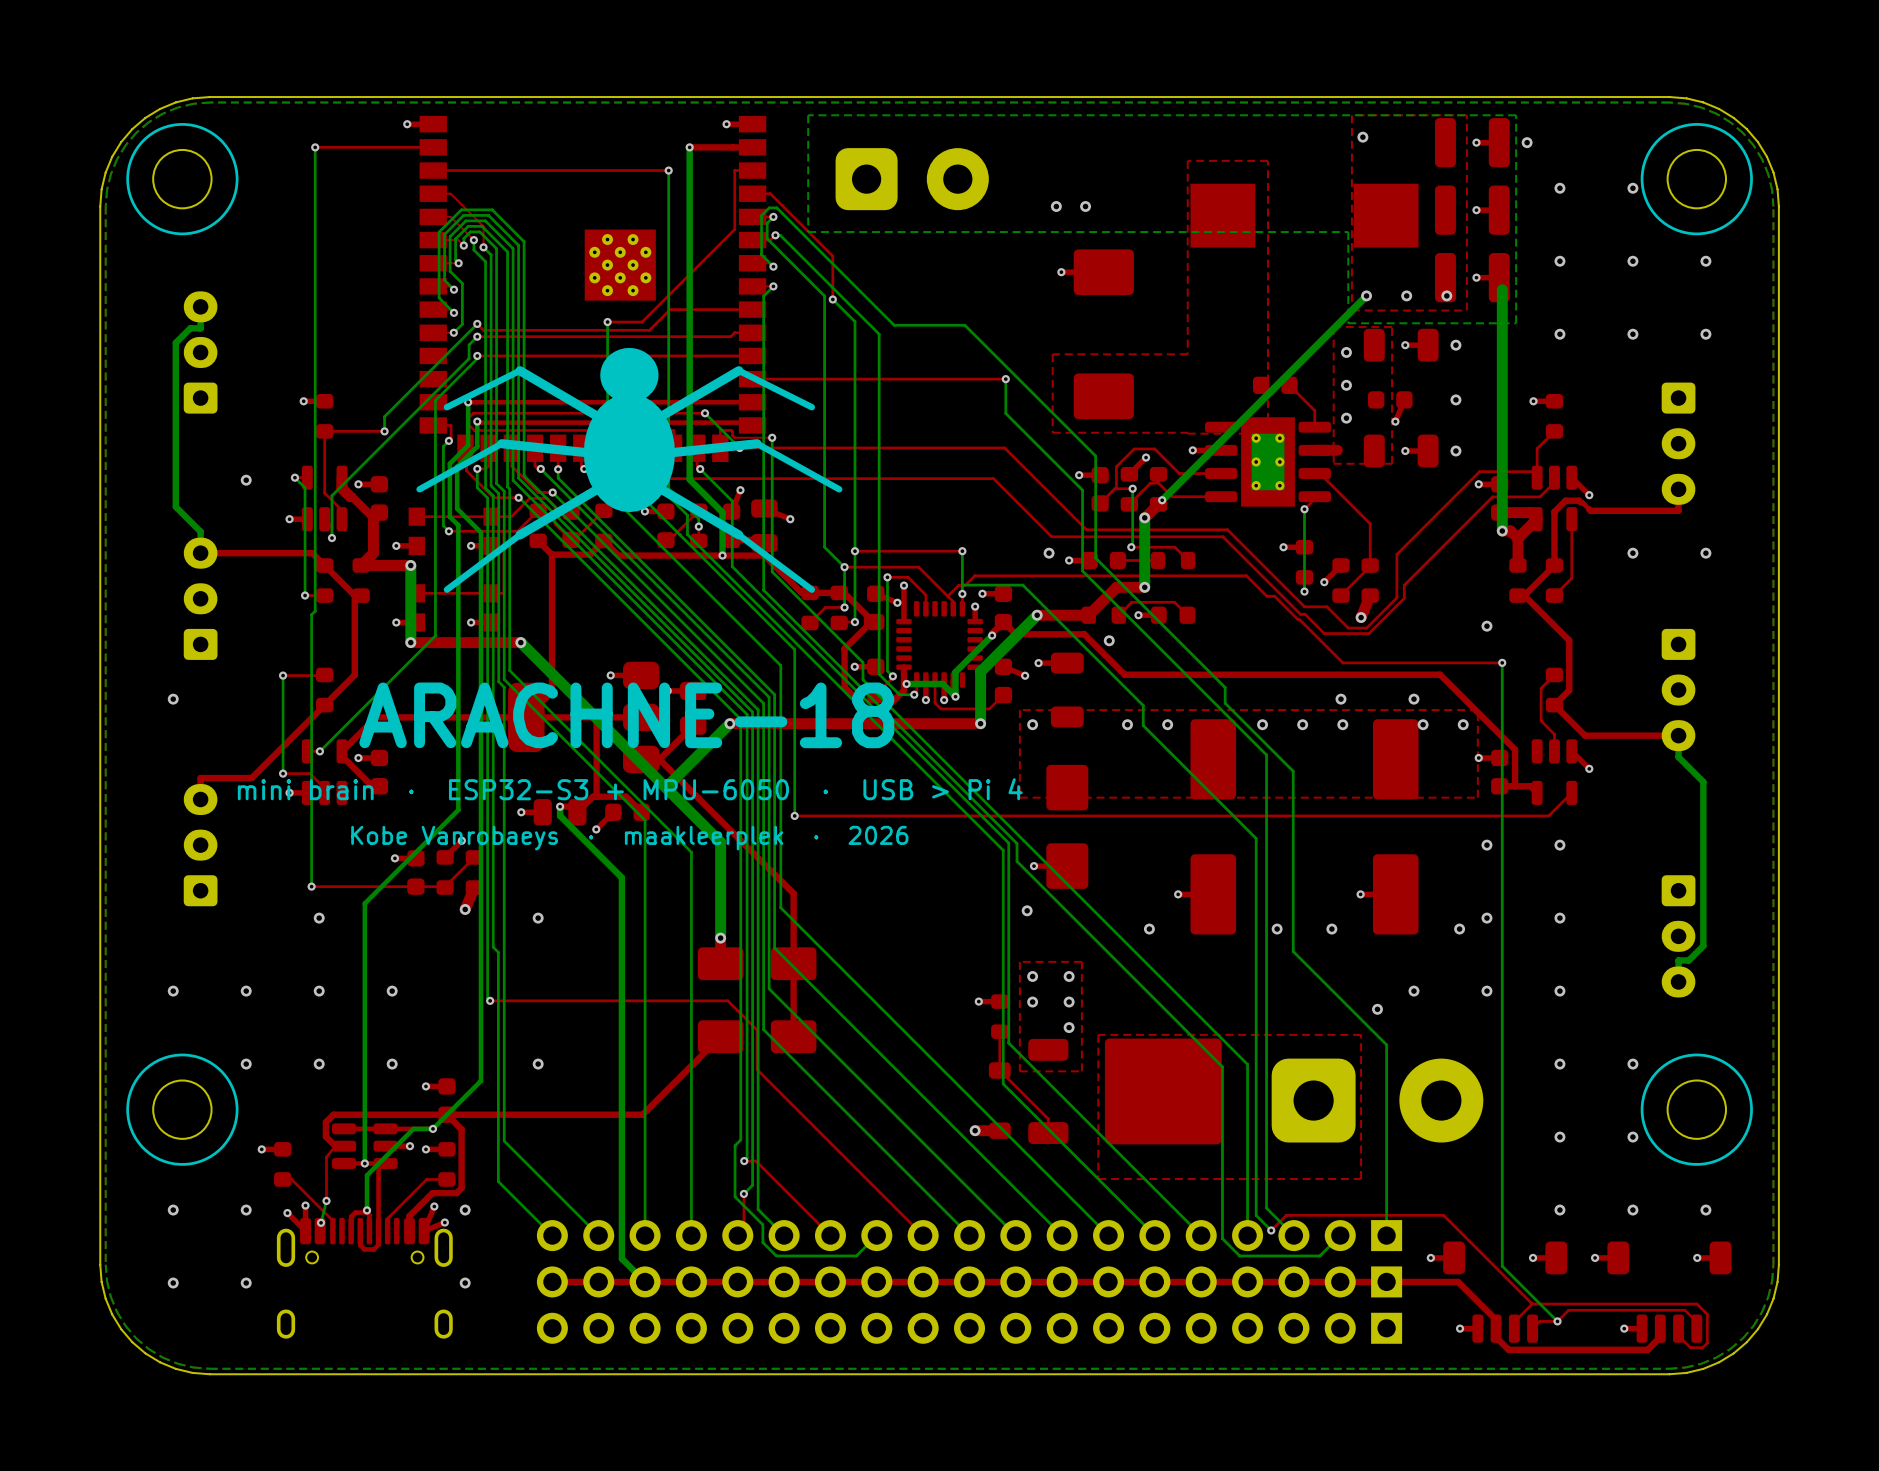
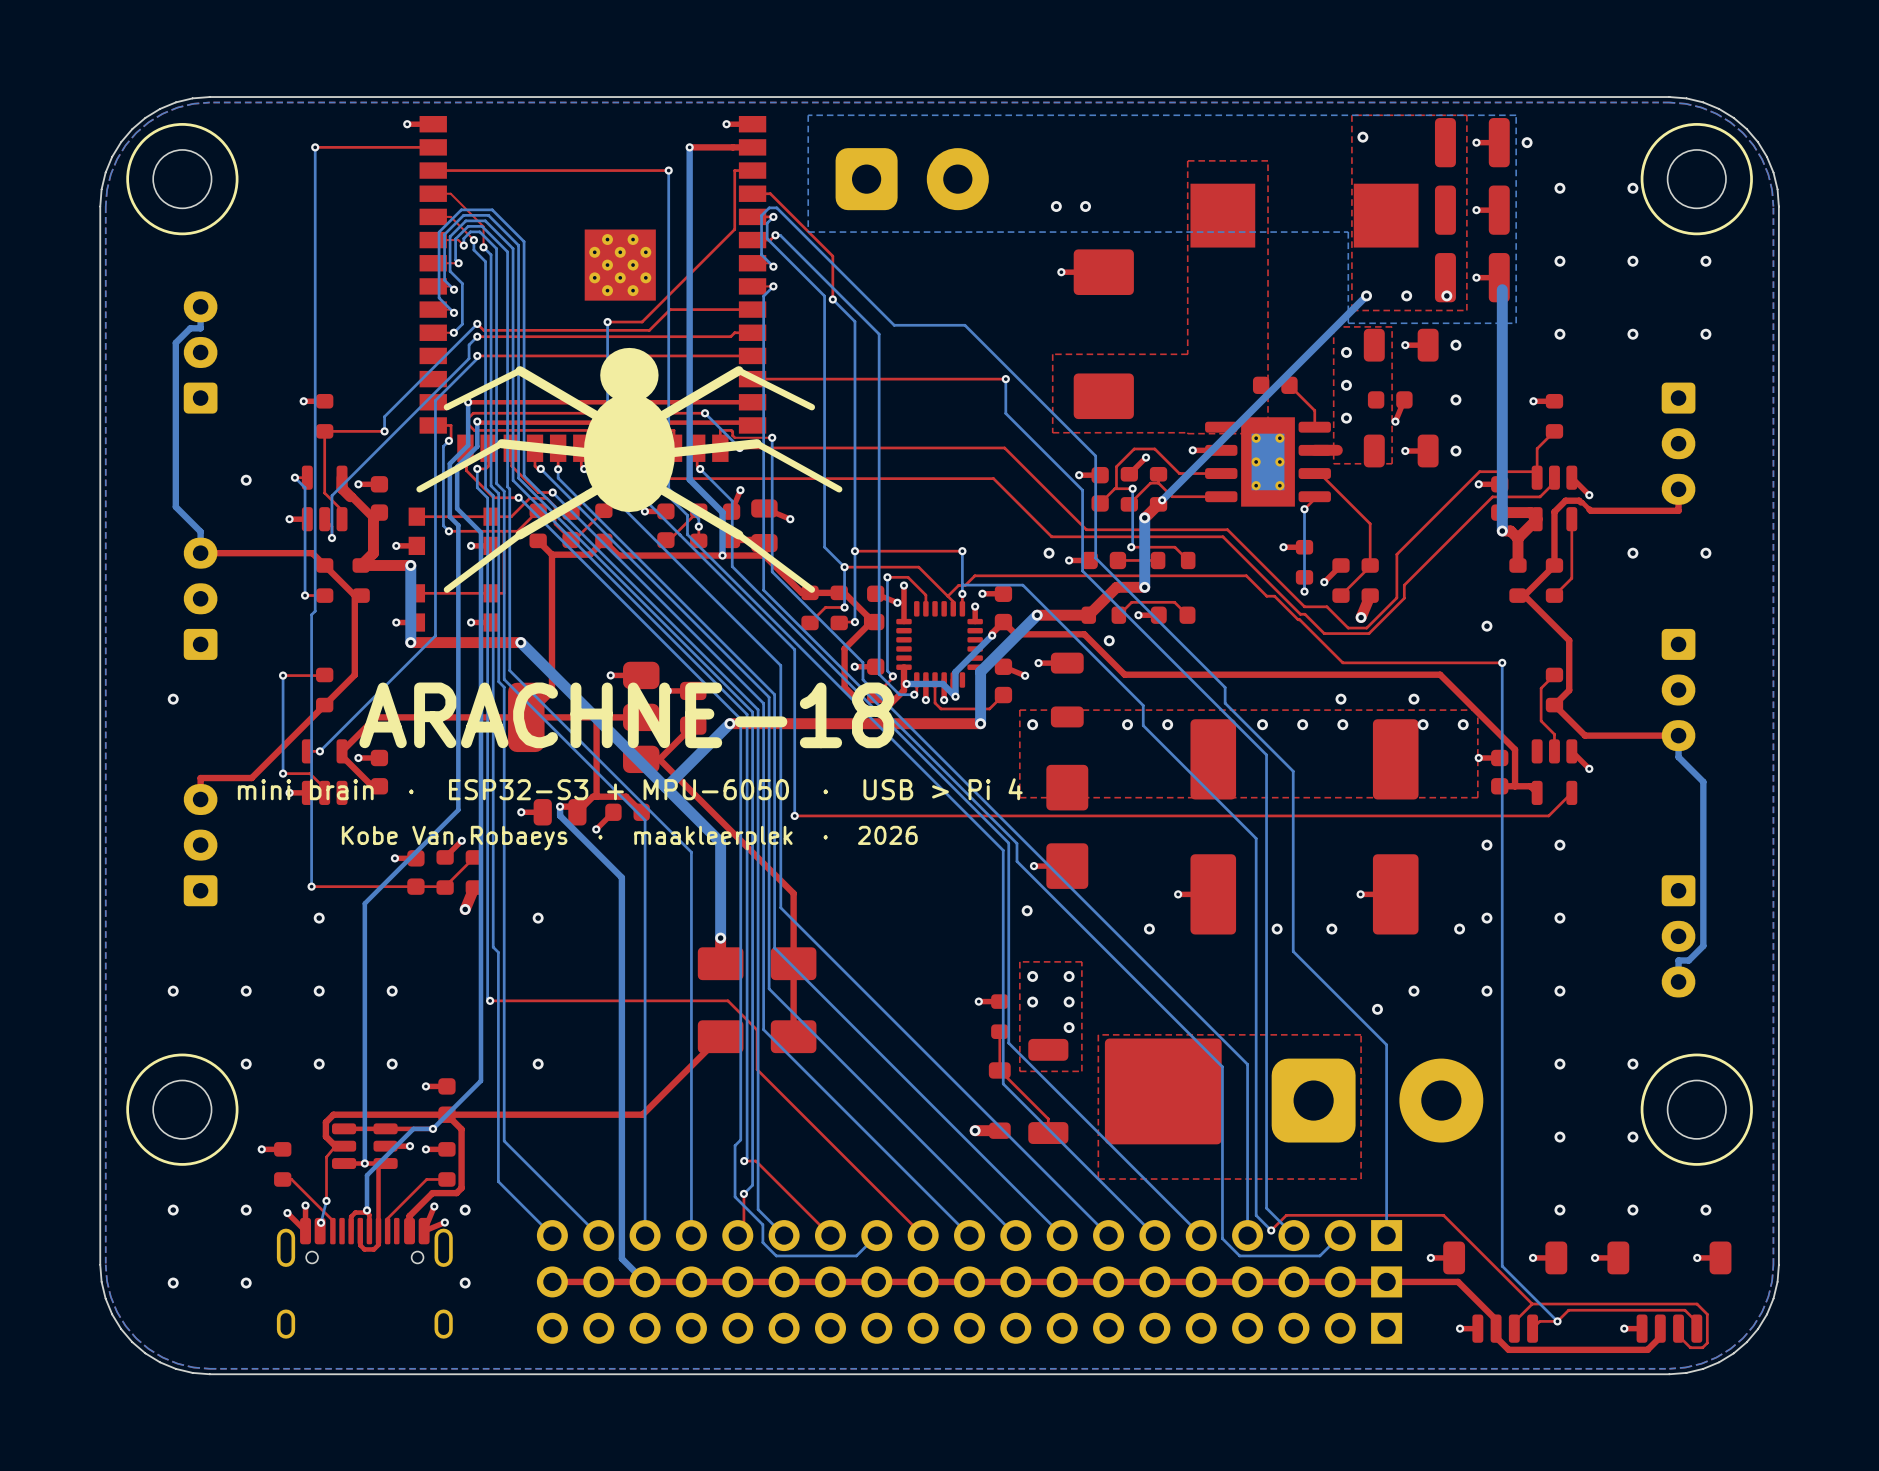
text: Kobe Vanrobaeys · maakleerplek · 2026 (629, 838) -> Kobe Van Robaeys · maakleerplek · 2026 (629, 838)

